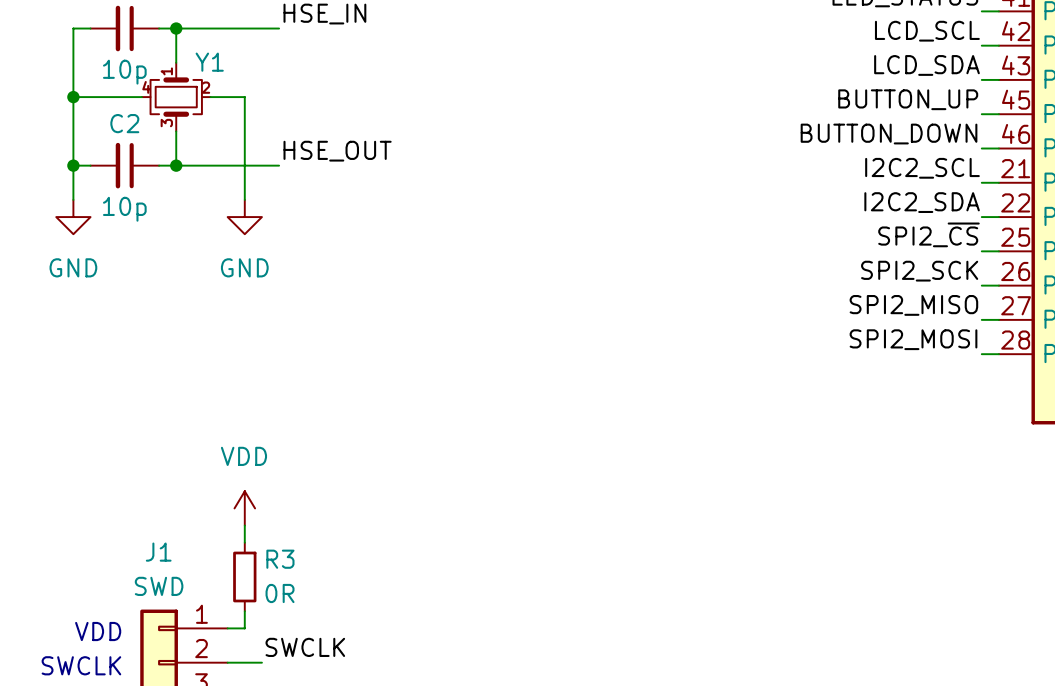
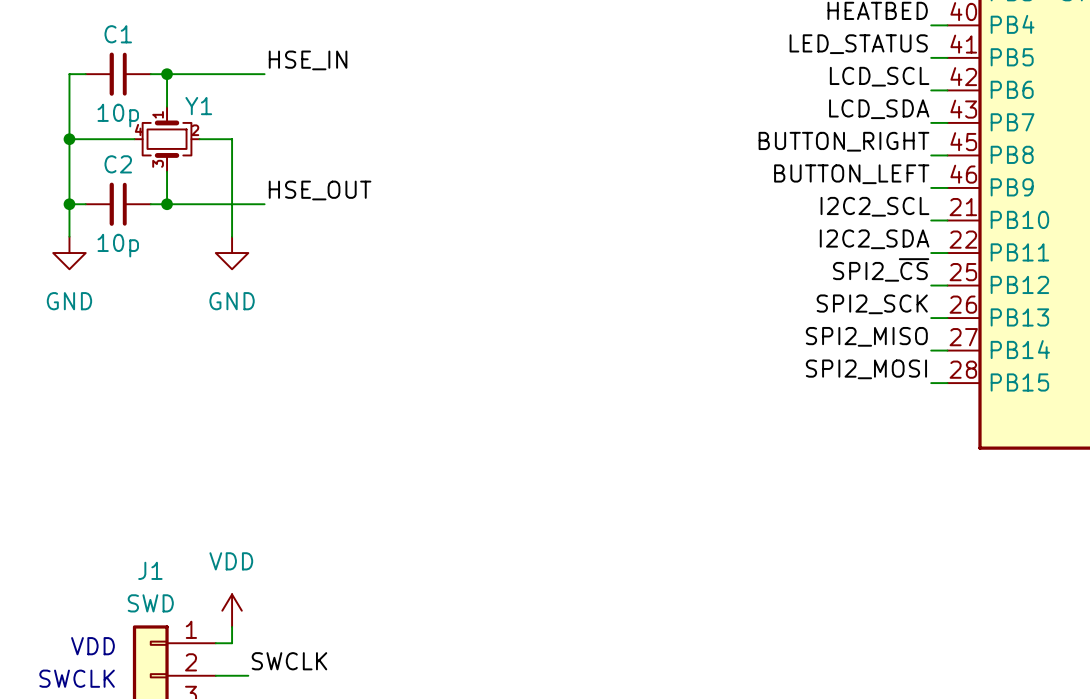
label: BUTTON_UP (908, 99) -> BUTTON_RIGHT (843, 141)
label: BUTTON_DOWN (889, 134) -> BUTTON_LEFT (851, 174)
power symbol position: VDD (244, 508) -> VDD (232, 610)
wire: (244, 525) (244, 542) -> none
R3: 0R (244, 576) -> none

